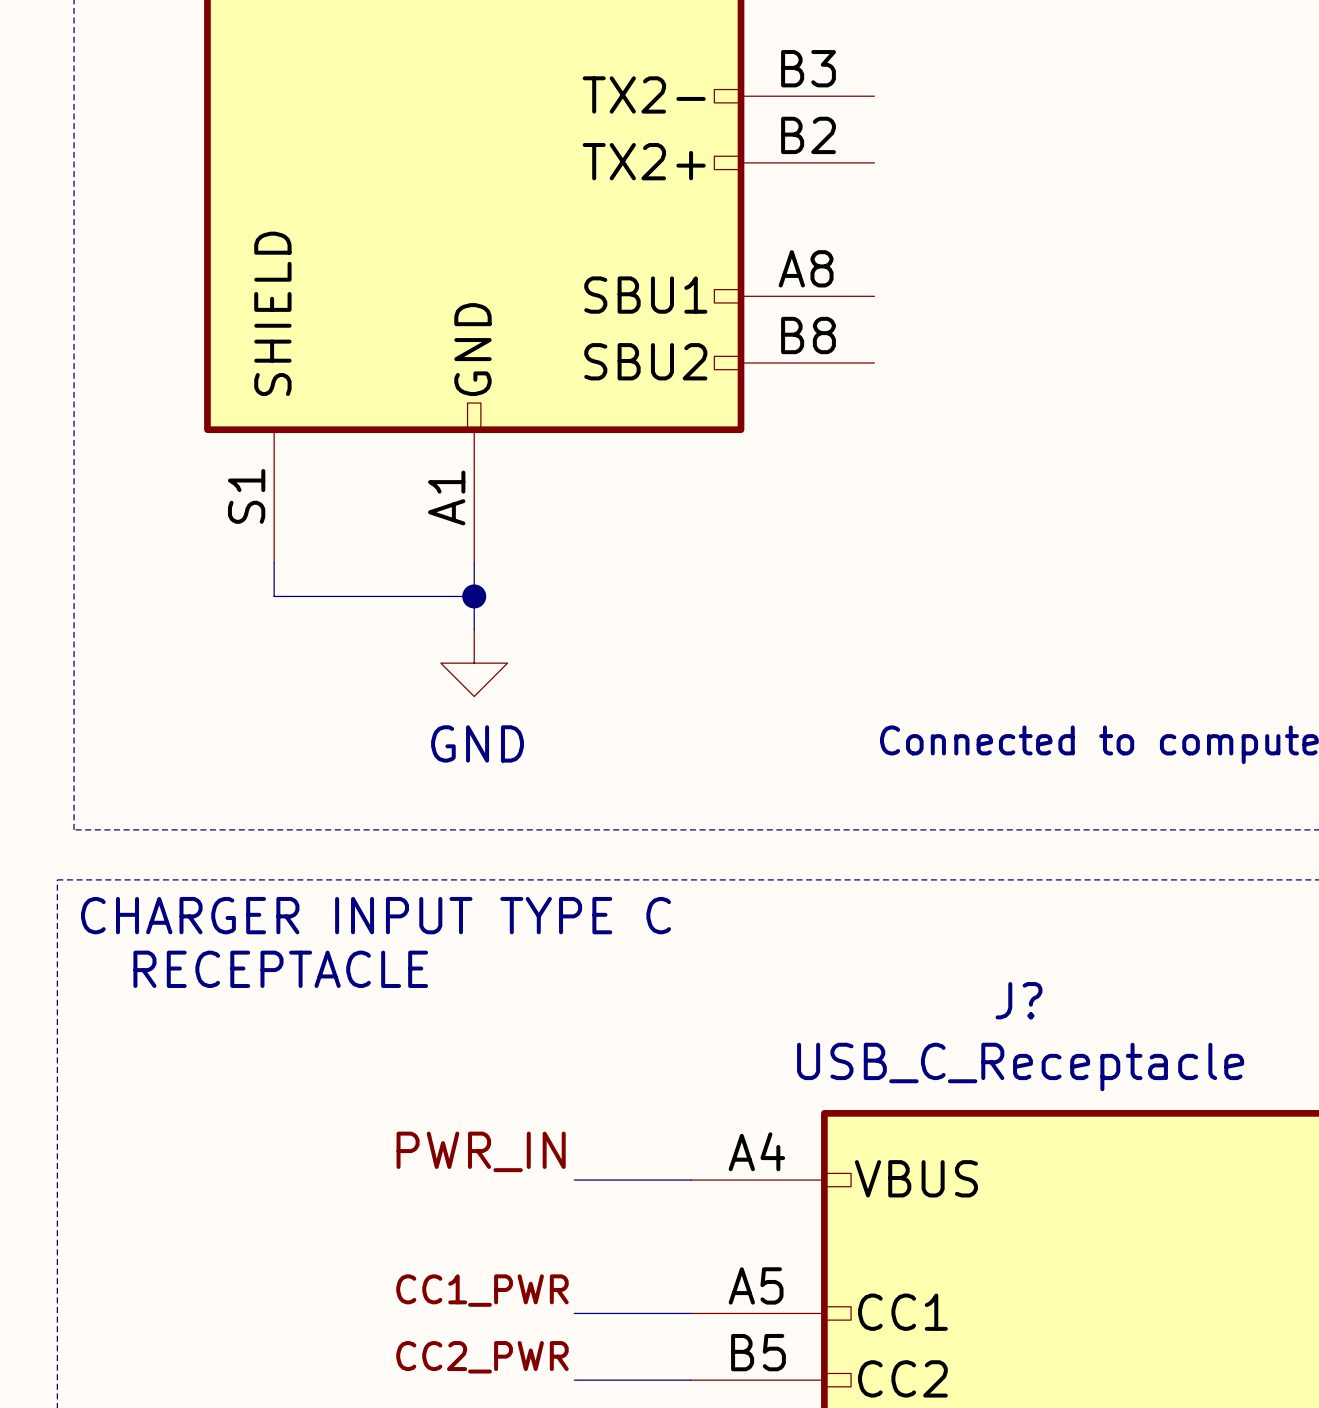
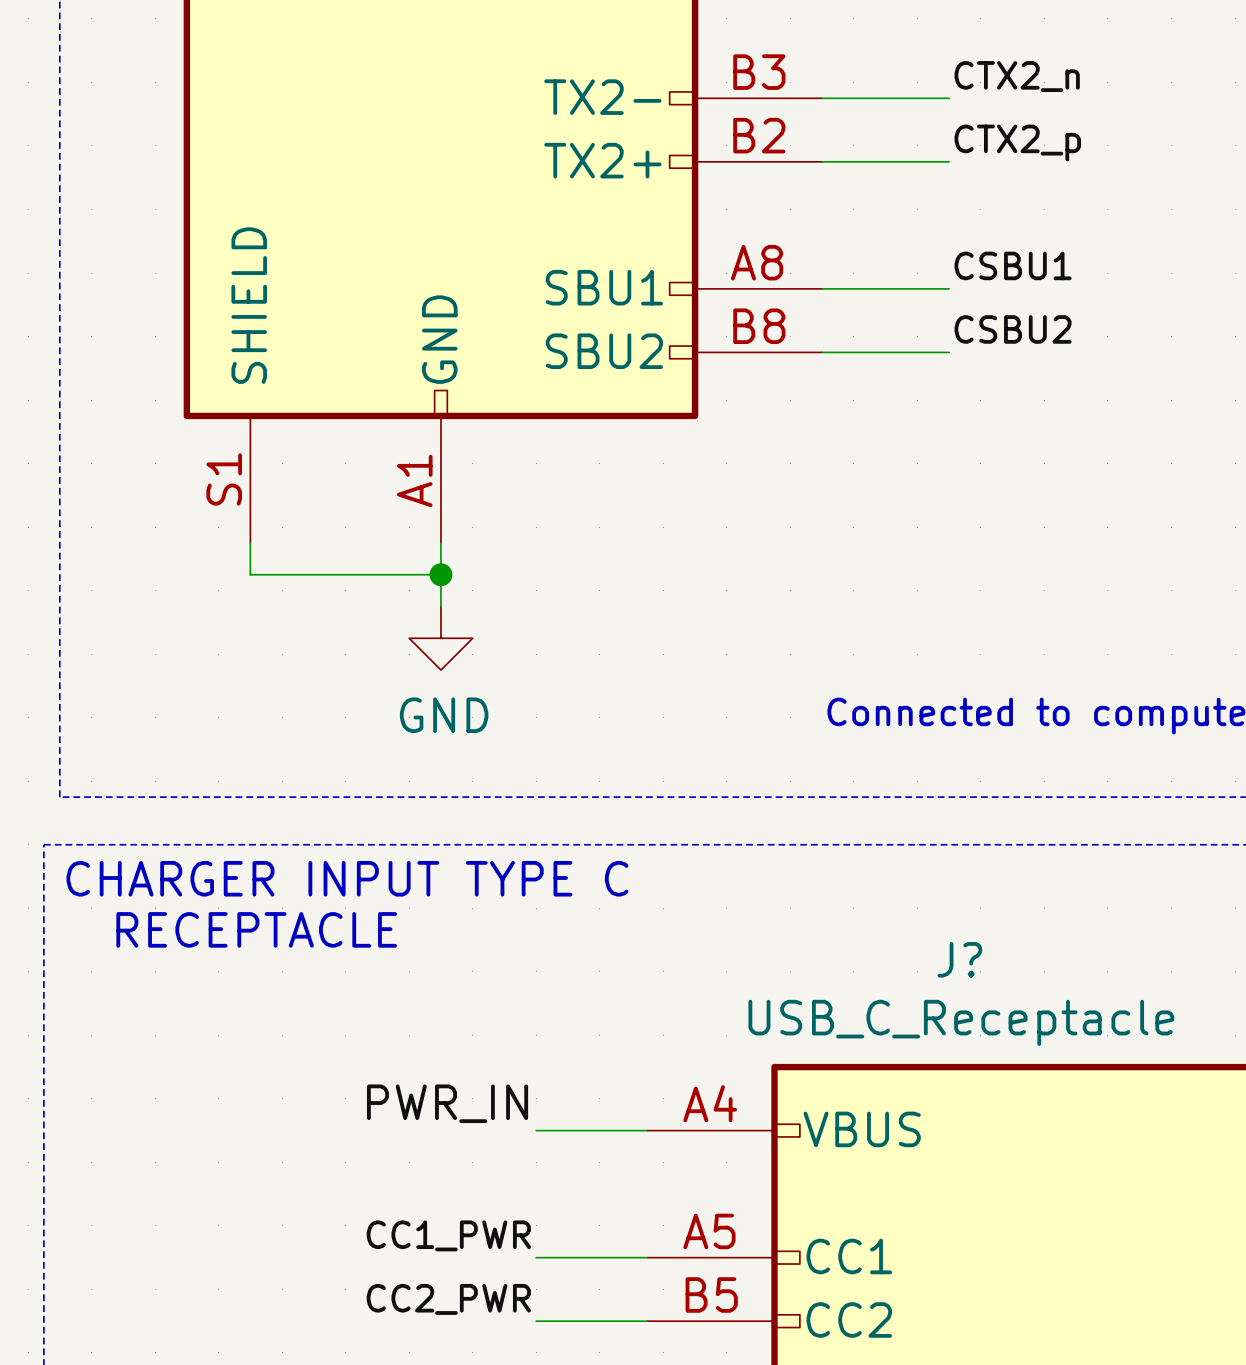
label: none -> CTX2_n (1017, 76)
wire: none -> (822, 98) (949, 98)
label: none -> CTX2_p (1017, 143)
wire: none -> (822, 161) (949, 161)
label: none -> CSBU1 (1013, 265)
wire: none -> (822, 288) (949, 288)
label: none -> CSBU2 (1013, 329)
wire: none -> (822, 352) (949, 352)

